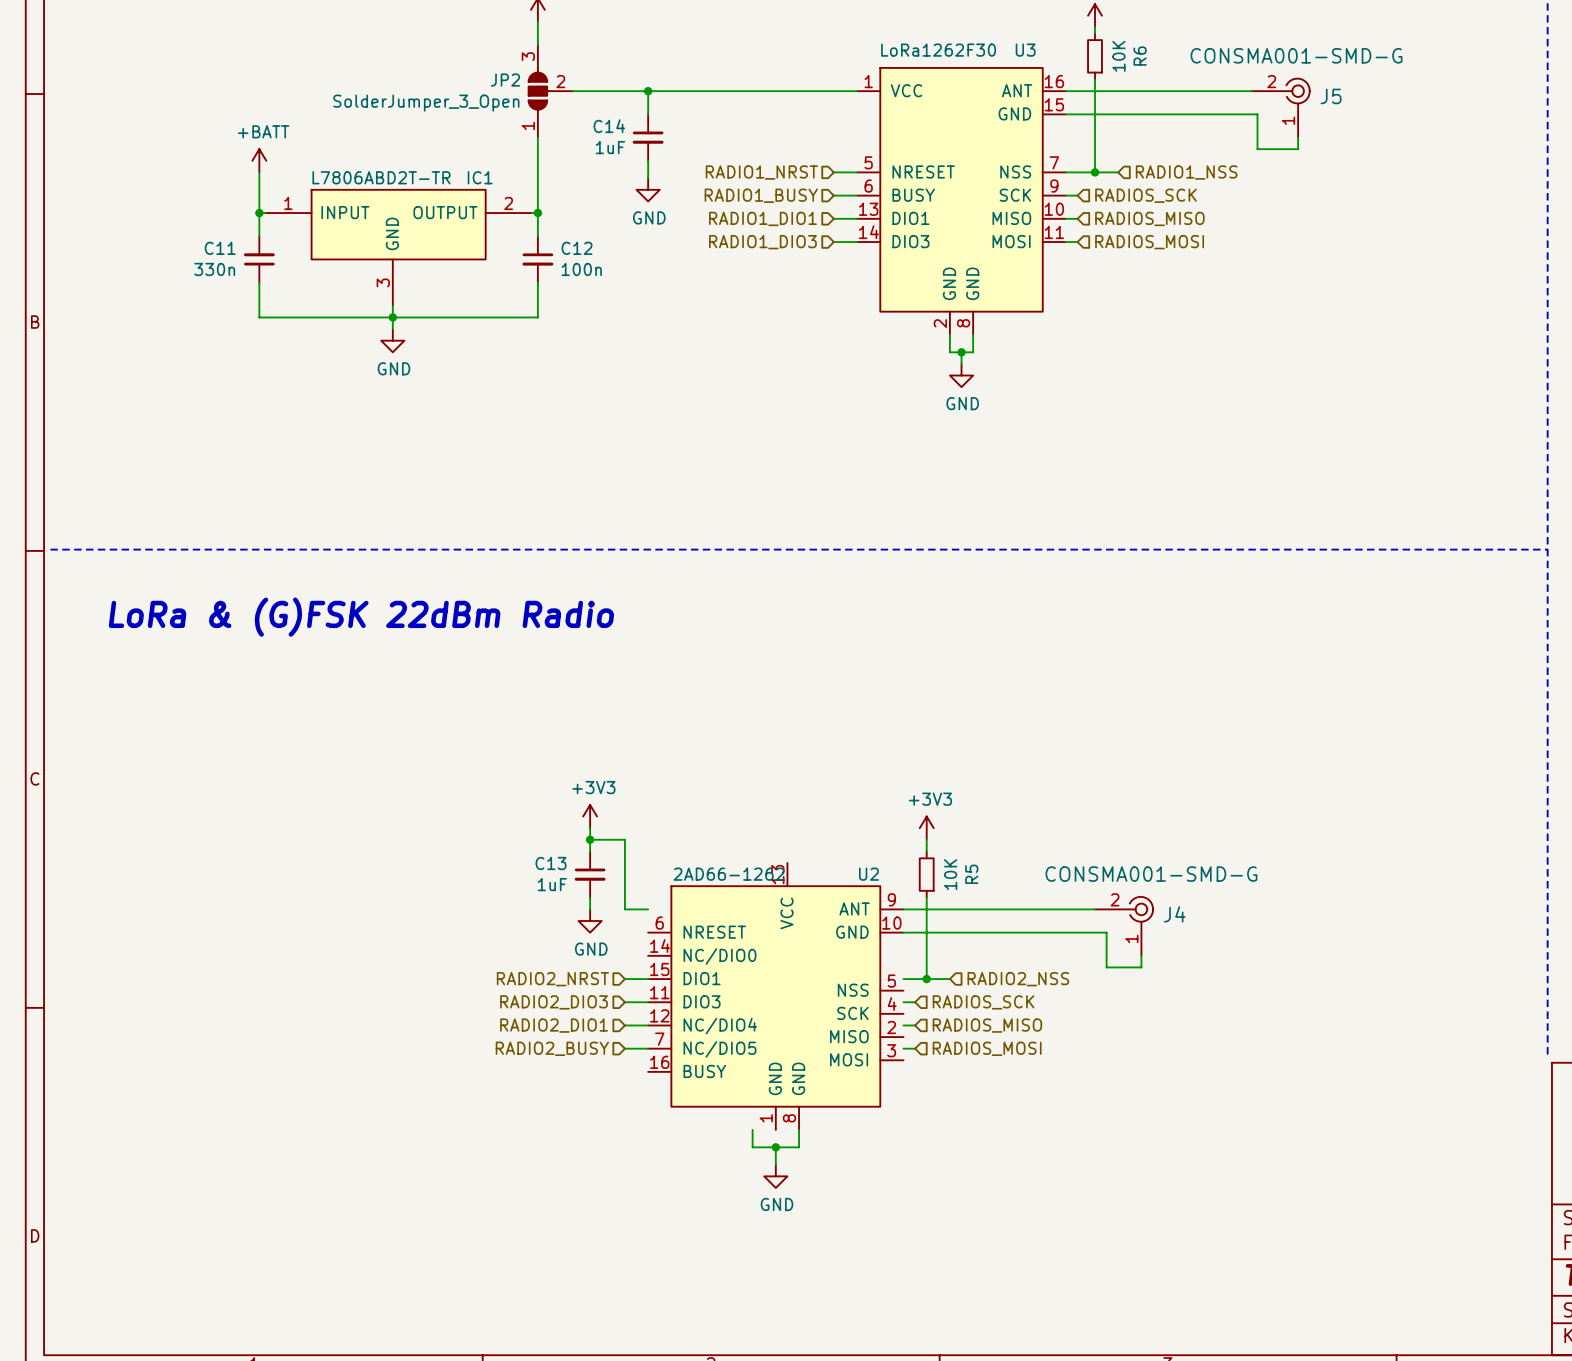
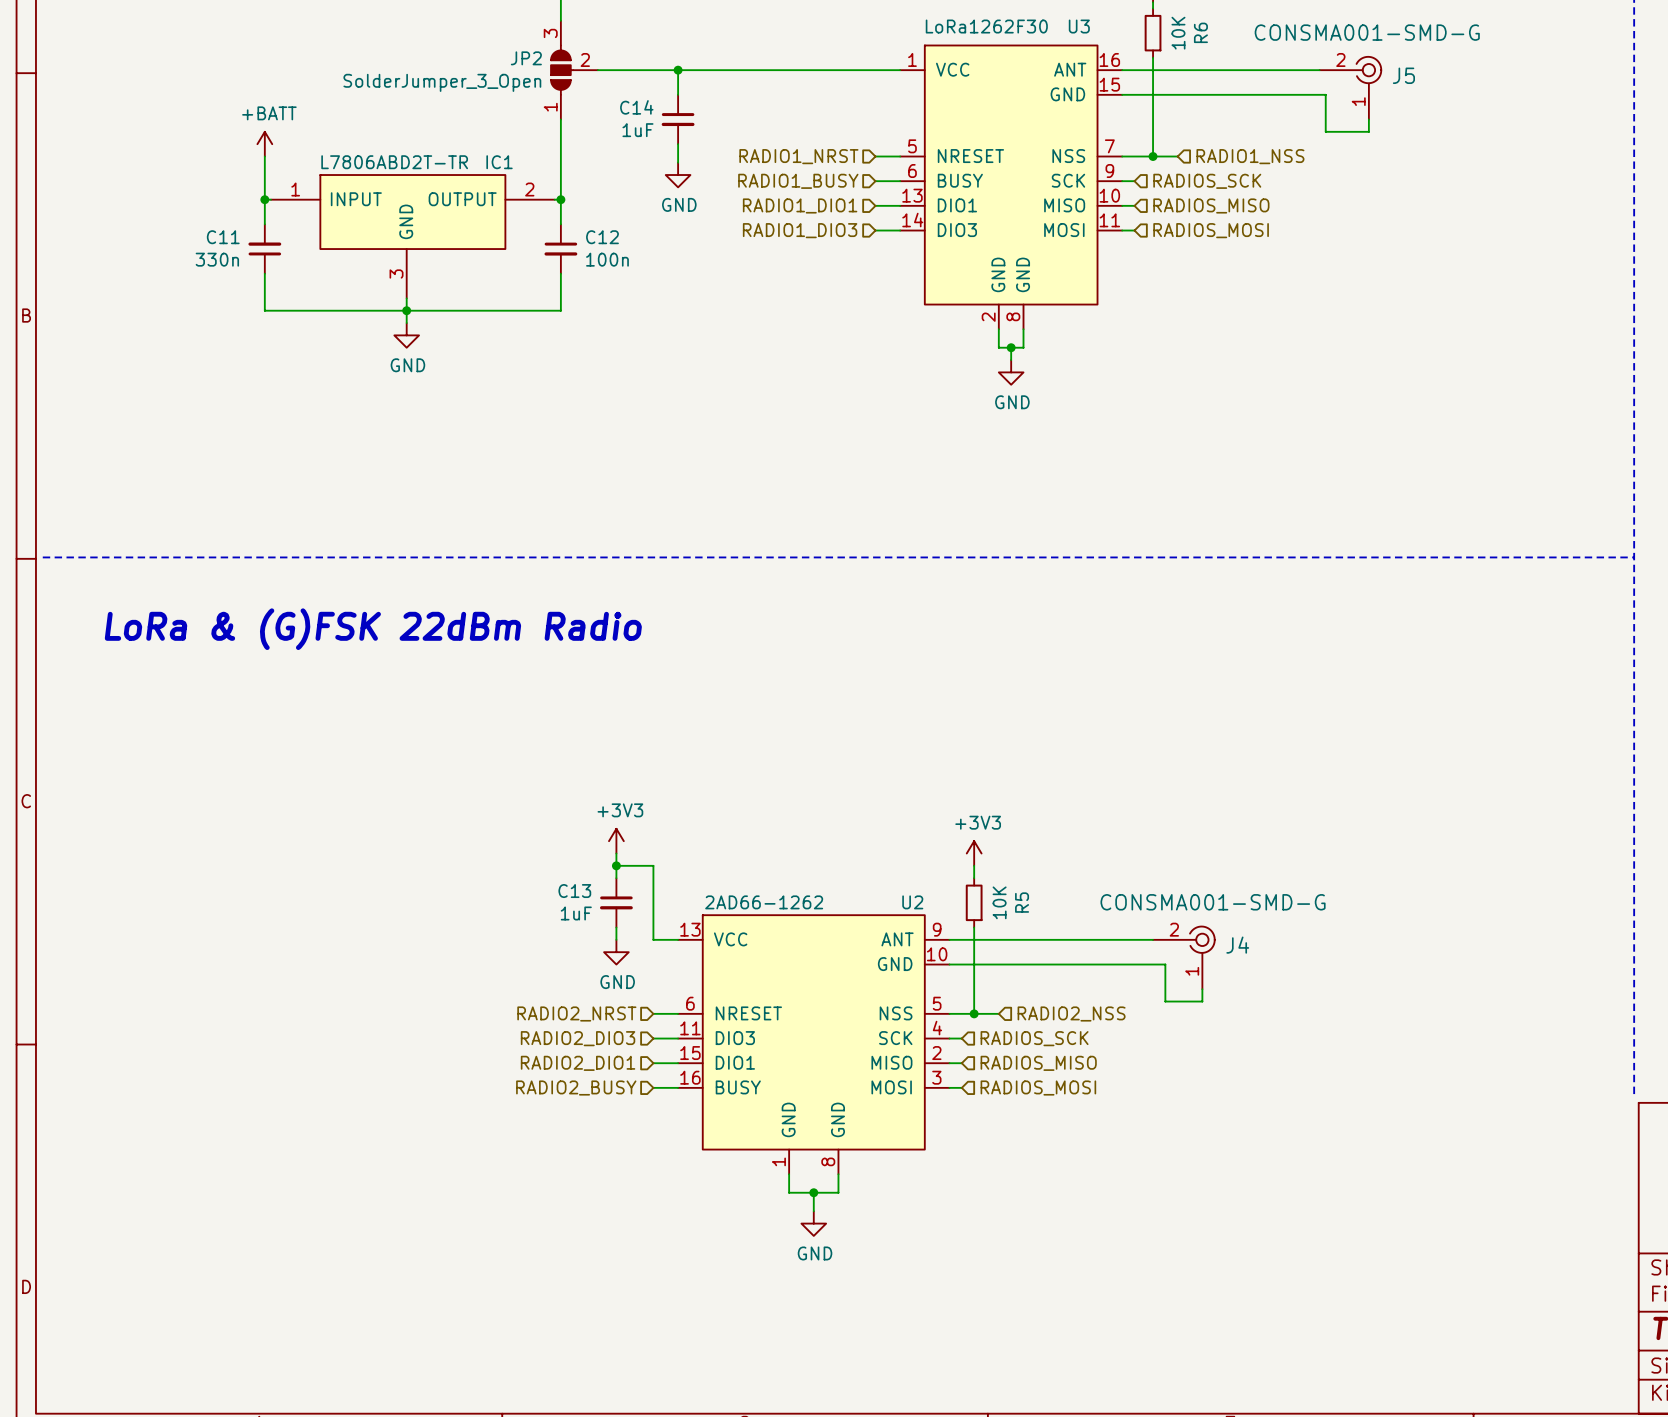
U2 symbol: [648, 862, 904, 1130] -> [678, 915, 950, 1175]

